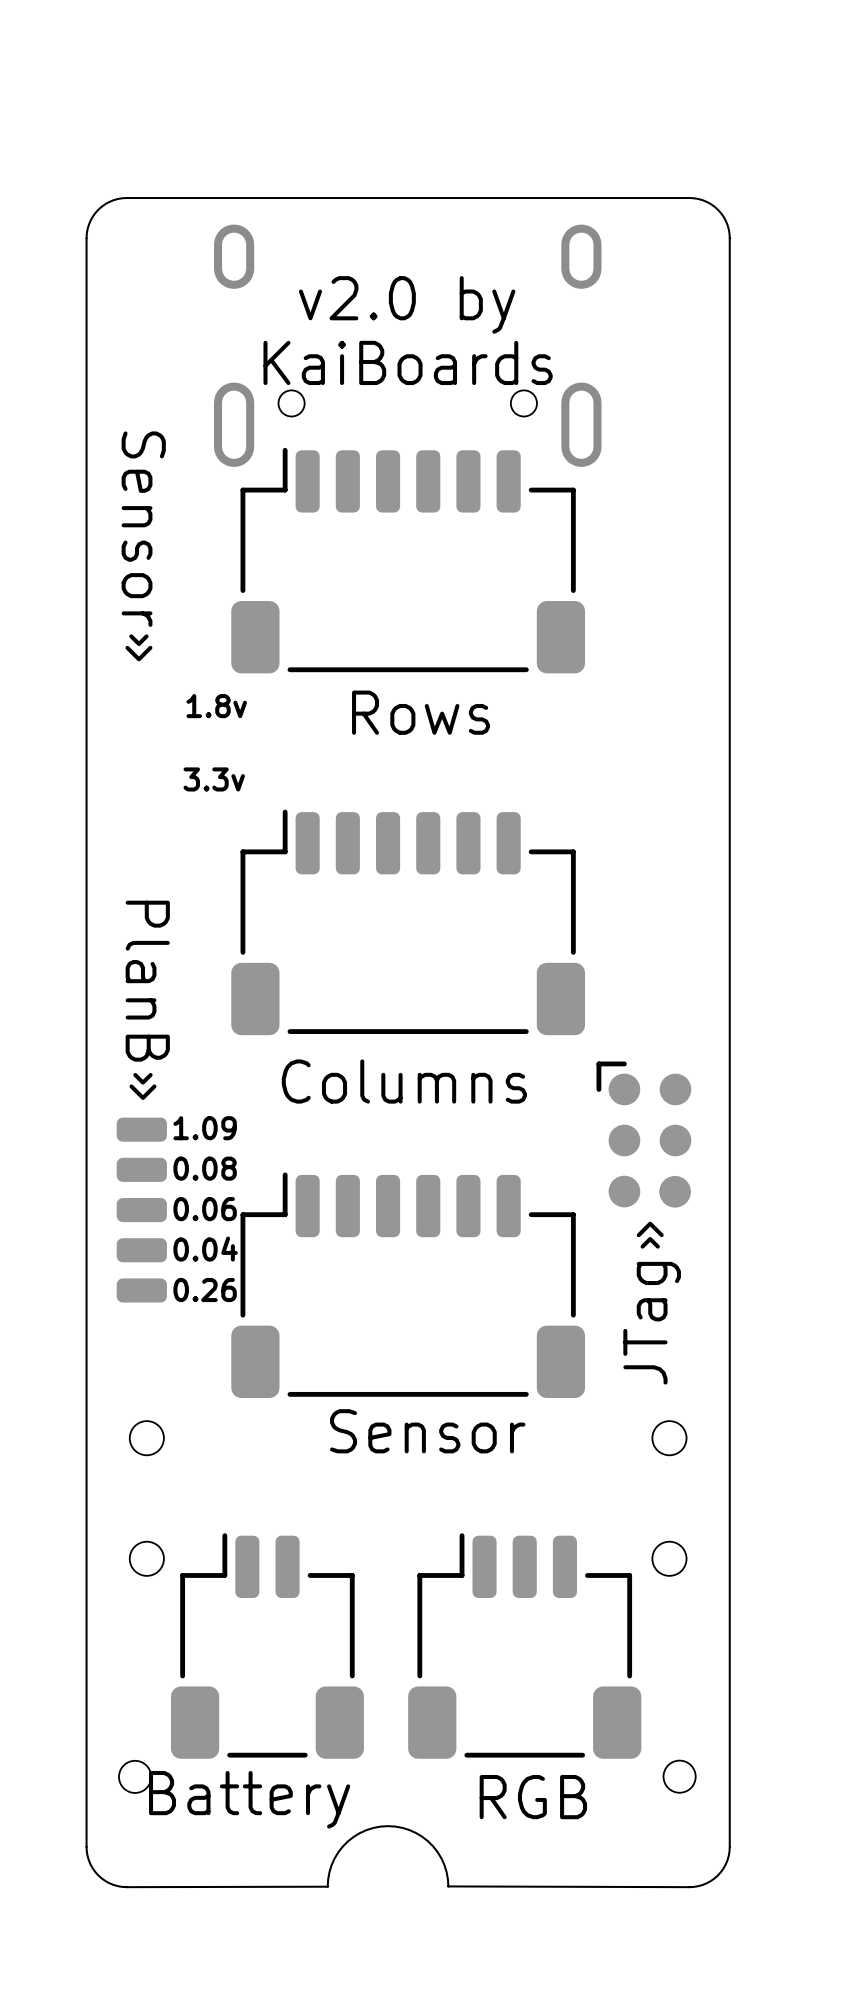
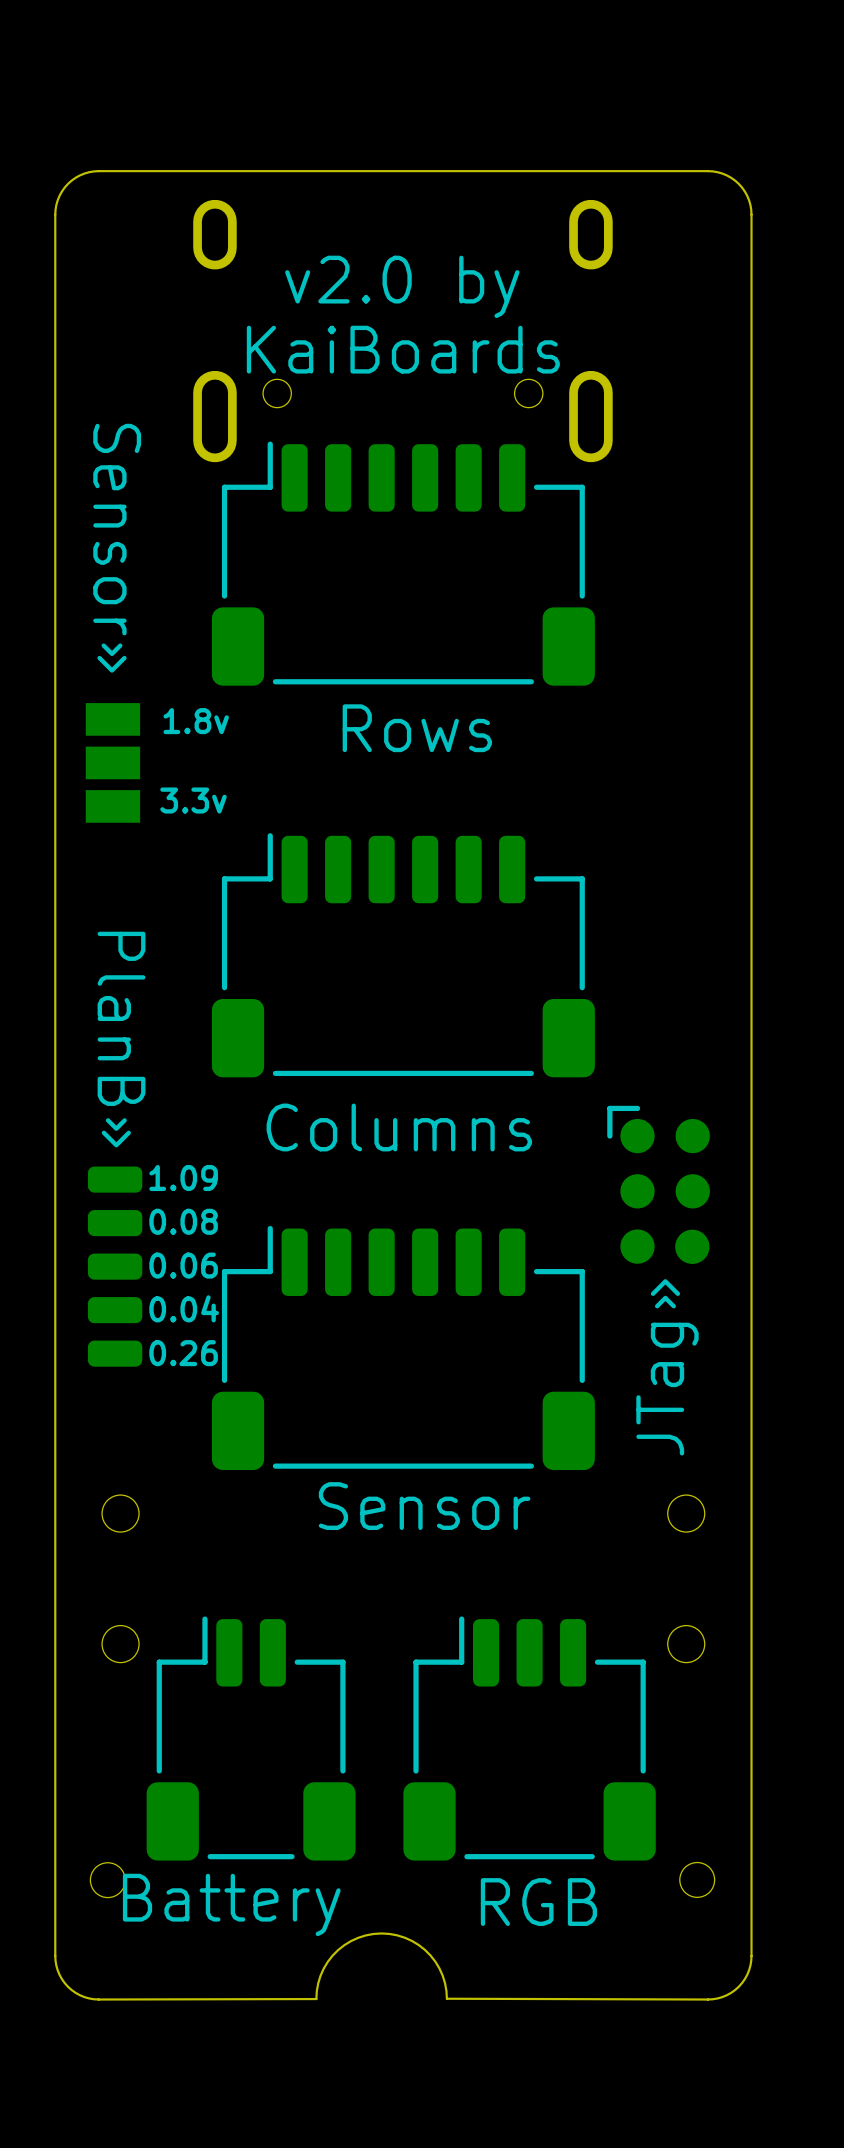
part: none -> (112, 762)

